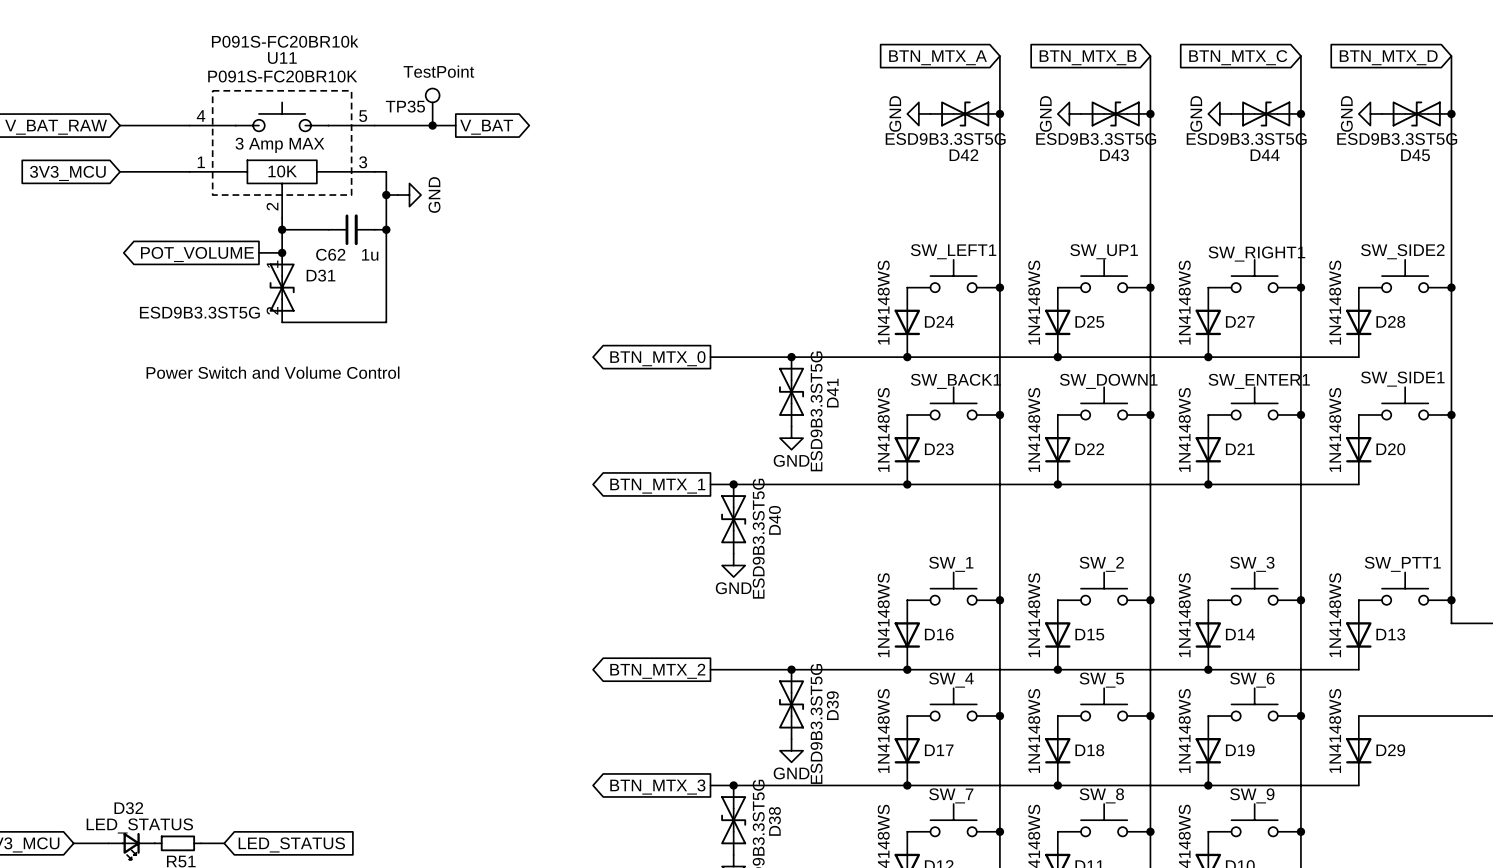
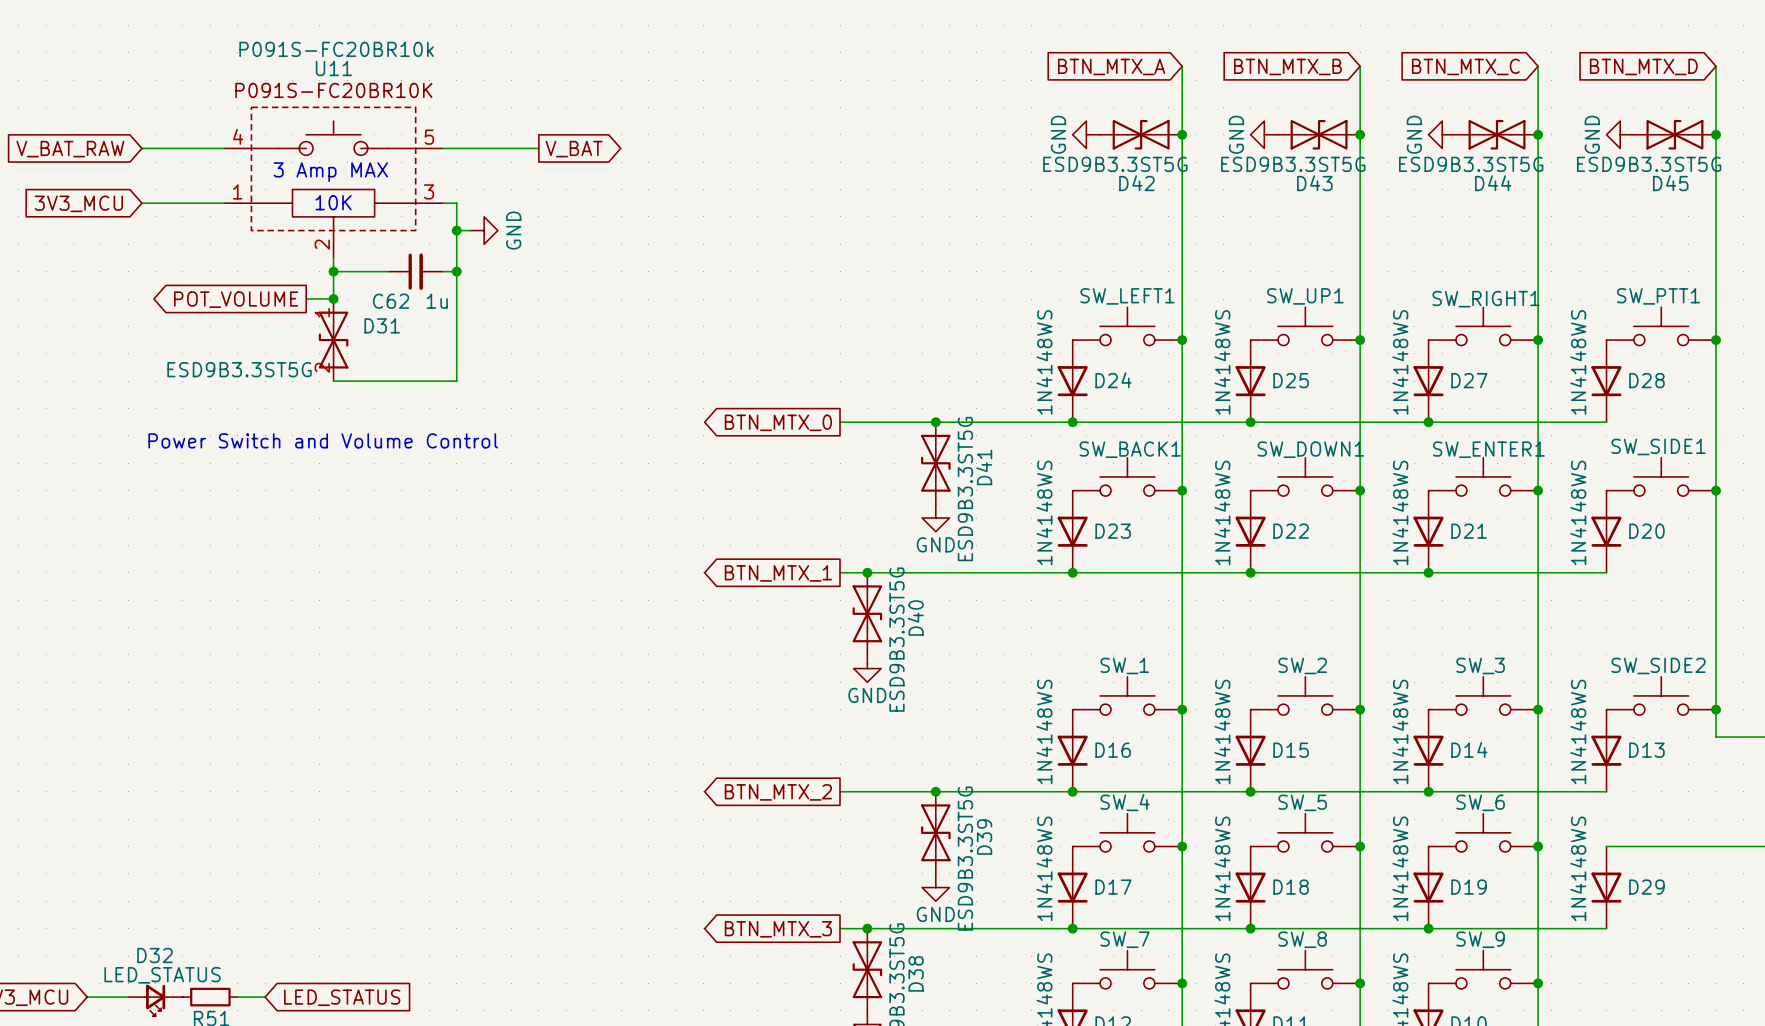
TP35: TestPoint (432, 107) -> none
junction: (432, 125) -> none
SW_SIDE2 name: SW_SIDE2 (1402, 251) -> SW_PTT1 (1658, 296)
SW_PTT1 name: SW_PTT1 (1402, 564) -> SW_SIDE2 (1658, 665)

